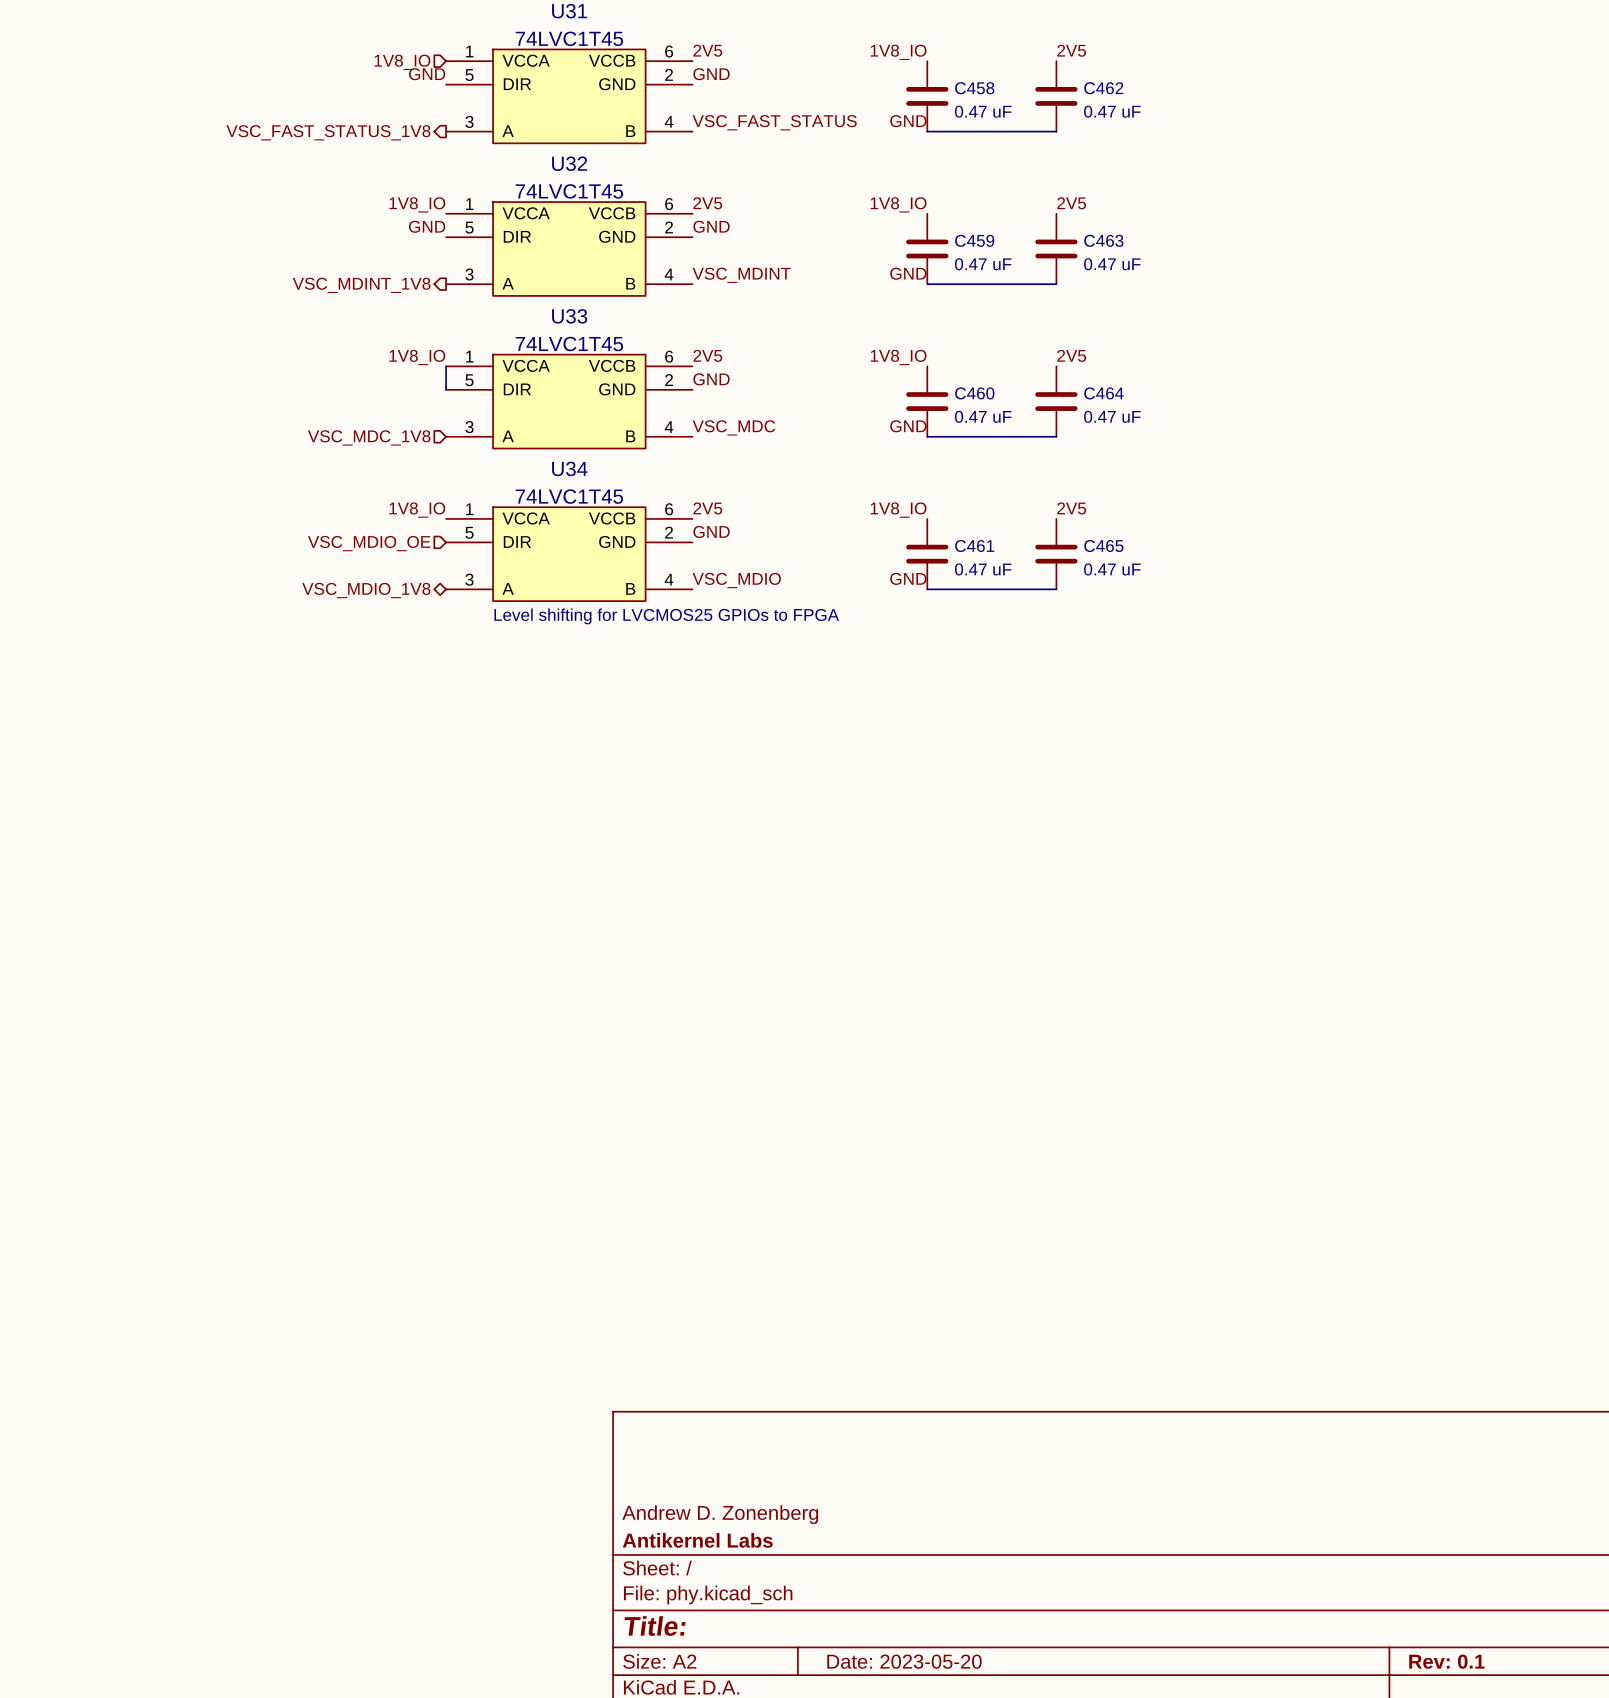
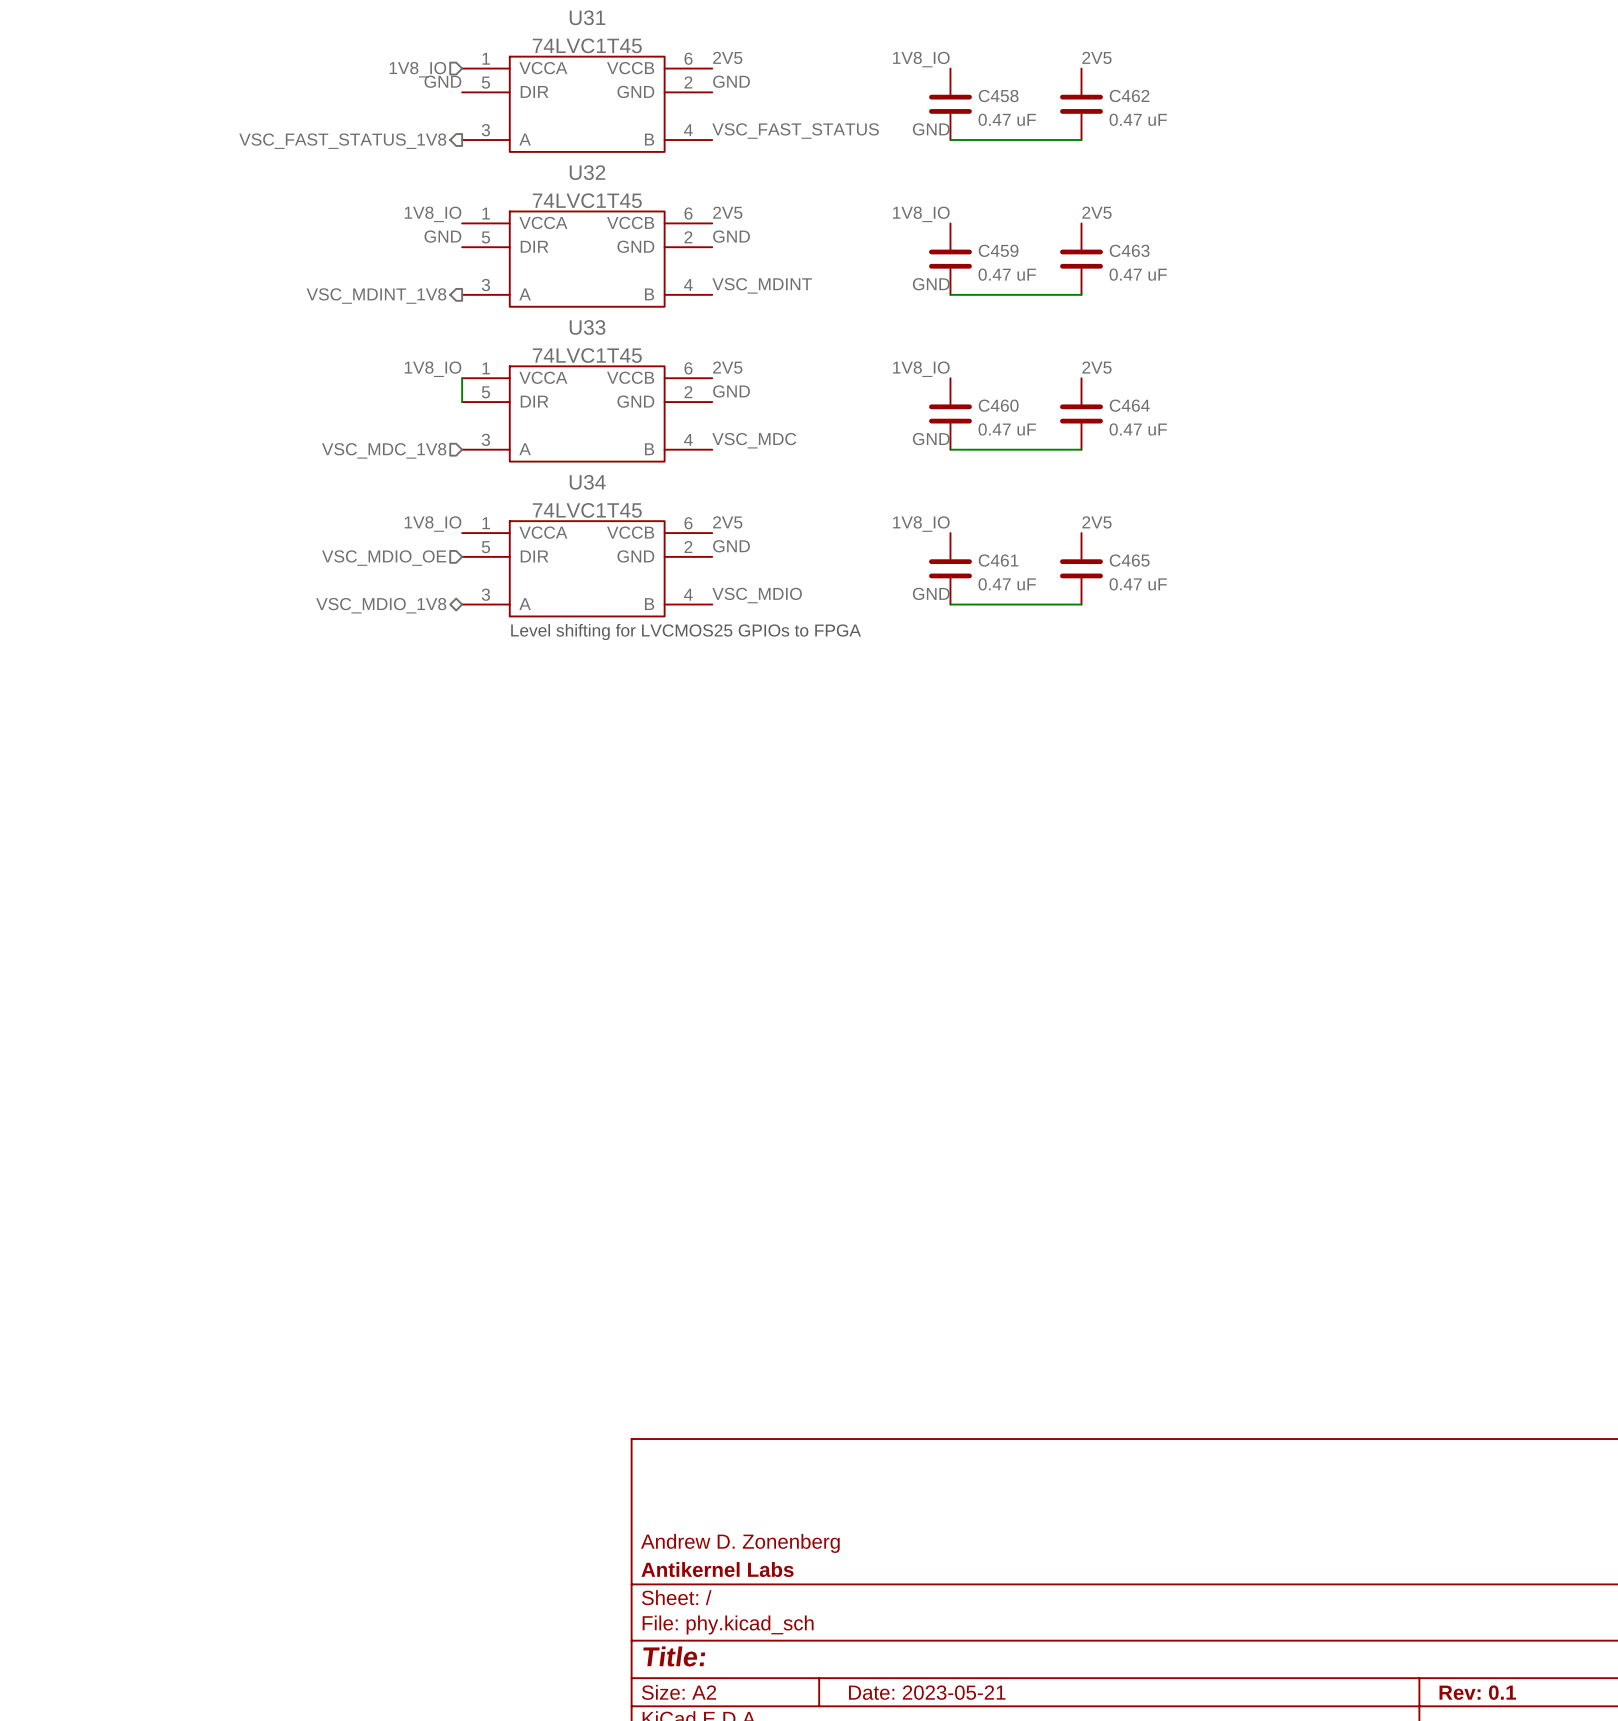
title block: Date: 2023-05-20 (904, 1661) -> Date: 2023-05-21 (927, 1692)

